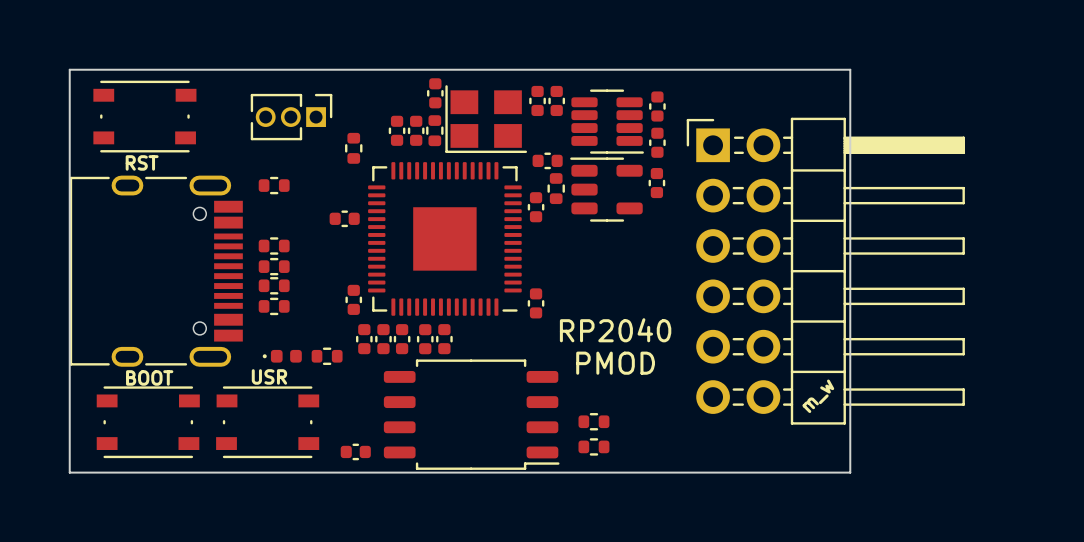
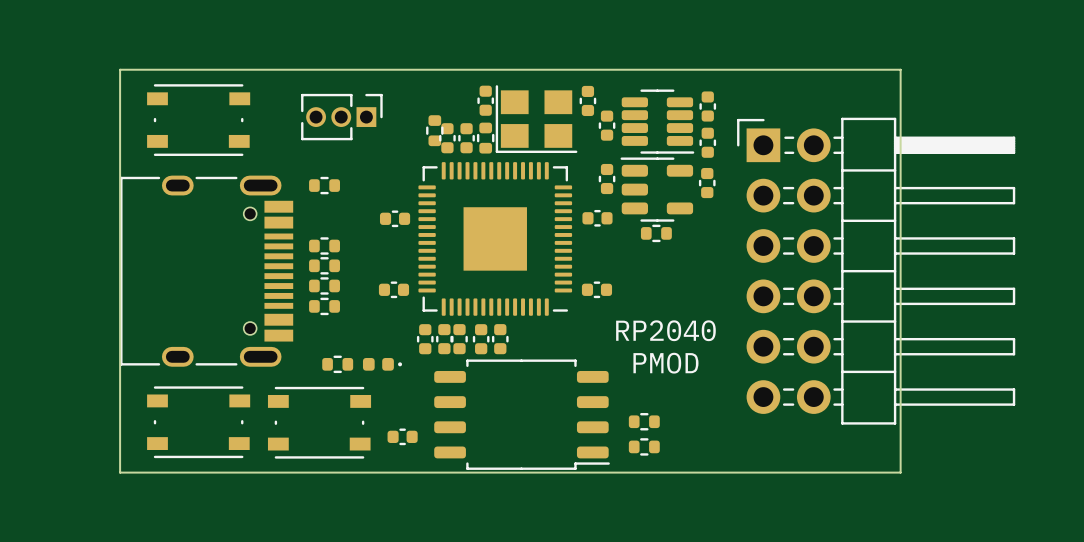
board edge: (120, 69) (69, 69) (69, 472) (120, 472) -> (120, 69) (120, 472)
board edge: (850, 69) (850, 472) -> (850, 69) (900, 69) (900, 472) (850, 472)
part footprint: [571, 89, 644, 154] -> [598, 110, 616, 141]
part: (435, 93) -> none
part: none -> (485, 100)
part: (537, 100) -> none
part: (556, 100) -> none
part: none -> (587, 100)
part: (657, 106) -> none
part: none -> (707, 106)
part position: (144, 116) -> (198, 120)
part position: (291, 117) -> (341, 117)
part position: (486, 119) -> (536, 119)
part: none -> (658, 121)
part: (397, 130) -> none
part: (416, 130) -> none
part: none -> (447, 138)
part: none -> (466, 138)
part: none -> (485, 138)
part: (657, 142) -> none
part: none -> (707, 142)
part: (353, 148) -> none
part footprint: [570, 157, 643, 222] -> [598, 163, 616, 195]
part: (547, 160) -> none
text: RST (142, 162) -> none
part footprint: [648, 167, 666, 199] -> [620, 157, 694, 222]
part: none -> (707, 183)
part: (274, 185) -> none
part: none -> (324, 185)
part: (556, 188) -> none
part: (536, 207) -> none
part: (344, 218) -> none
part: none -> (395, 218)
part: none -> (597, 218)
part: none -> (656, 233)
part position: (444, 238) -> (495, 238)
part: (274, 245) -> none
part: none -> (324, 245)
part: none -> (324, 265)
part: (274, 266) -> none
part position: (156, 271) -> (206, 271)
part position: (825, 271) -> (876, 271)
part: (274, 285) -> none
part: none -> (324, 285)
part: none -> (393, 289)
part: none -> (596, 289)
part: (353, 299) -> none
part: (536, 303) -> none
part: (274, 306) -> none
part: none -> (324, 306)
text position: RP2040 (615, 330) -> RP2040 (665, 330)
part: (364, 339) -> none
part: (383, 339) -> none
part: (402, 339) -> none
part: none -> (459, 339)
part: none -> (481, 339)
part: none -> (500, 339)
part rotation: 0° (282, 356) -> 180° (382, 364)
part position: (282, 356) -> (382, 364)
part position: (327, 356) -> (337, 364)
text position: PMOD (615, 363) -> PMOD (665, 363)
text: USR (269, 376) -> none
text: BOOT (149, 377) -> none
text: m_w (818, 396) -> none
part position: (471, 414) -> (522, 414)
part: (593, 421) -> none
part: none -> (644, 421)
part: (148, 422) -> none
part: none -> (198, 422)
part: (267, 422) -> none
part: none -> (319, 422)
part: none -> (402, 436)
part: (593, 446) -> none
part: none -> (644, 446)
part: (355, 451) -> none

